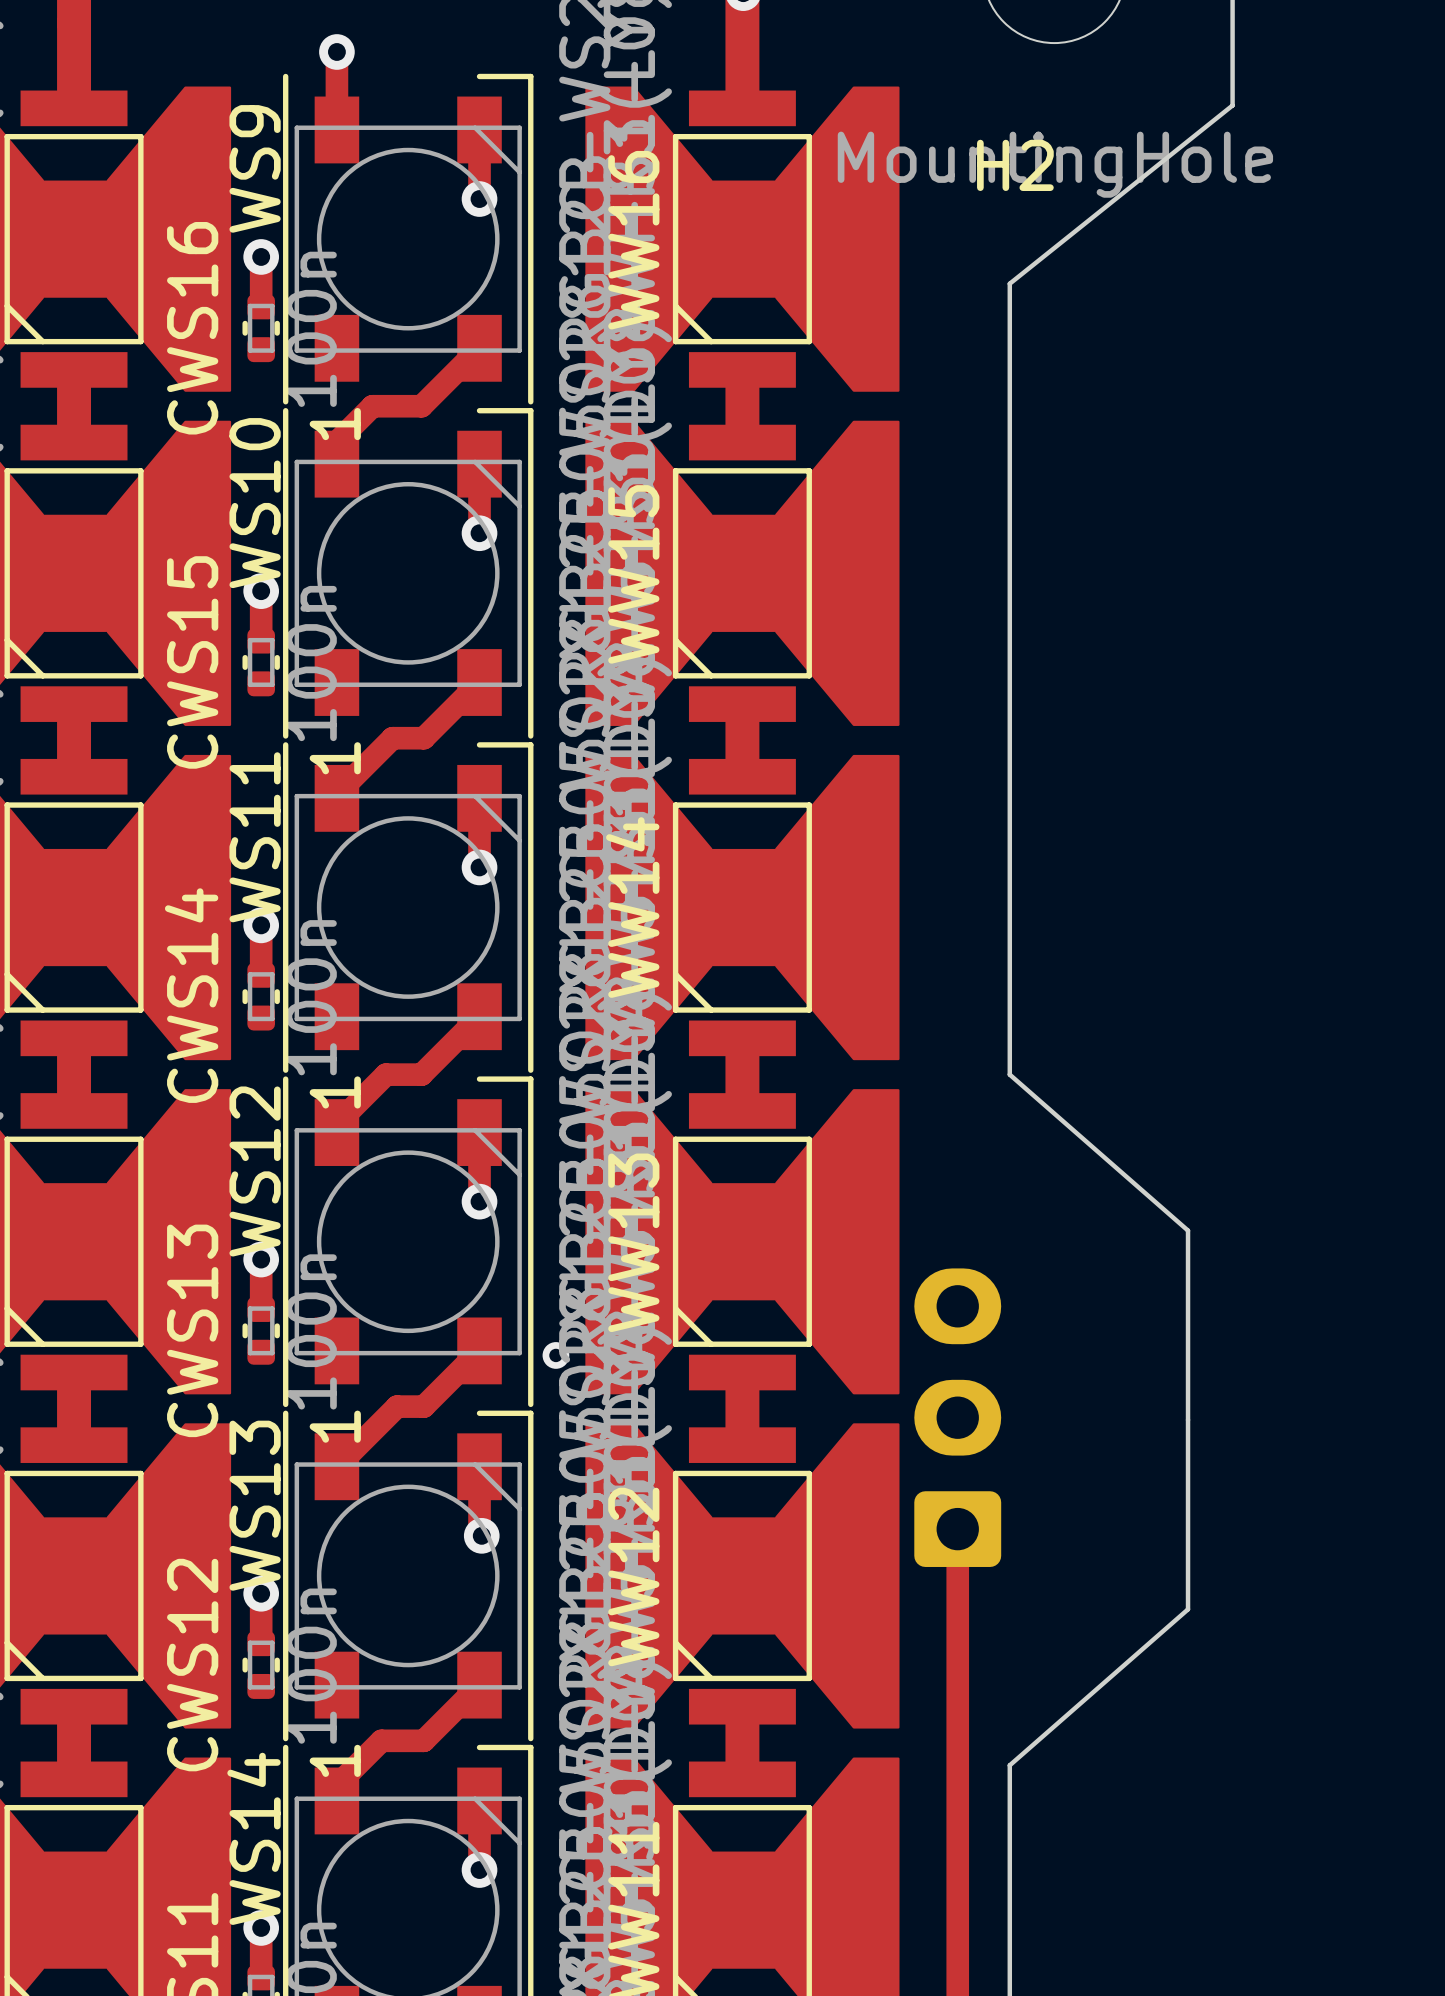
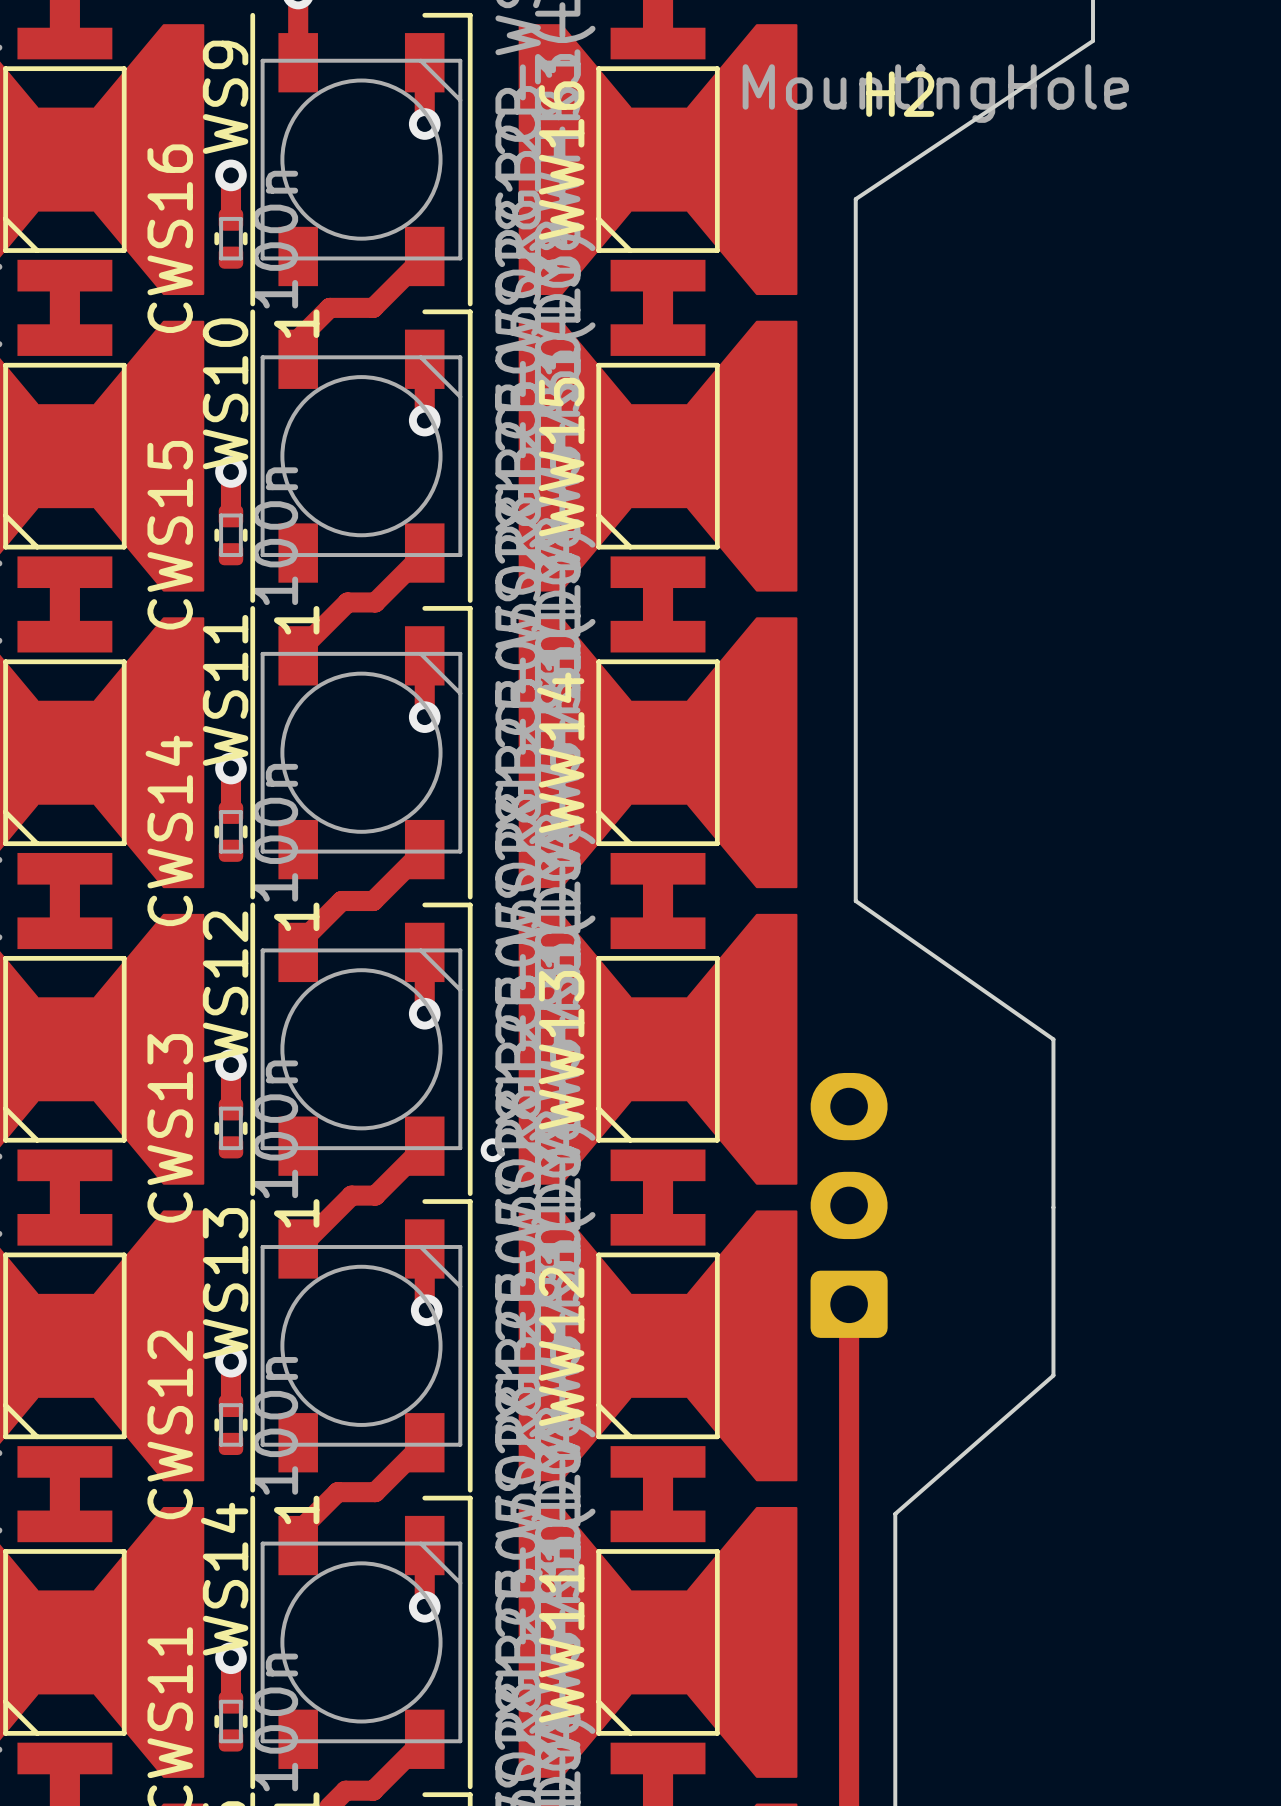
board edge: (1232, 105) (1009, 283) (1009, 1074) (1188, 1230) -> (1093, 40) (855, 199) (855, 901) (1053, 1039)

